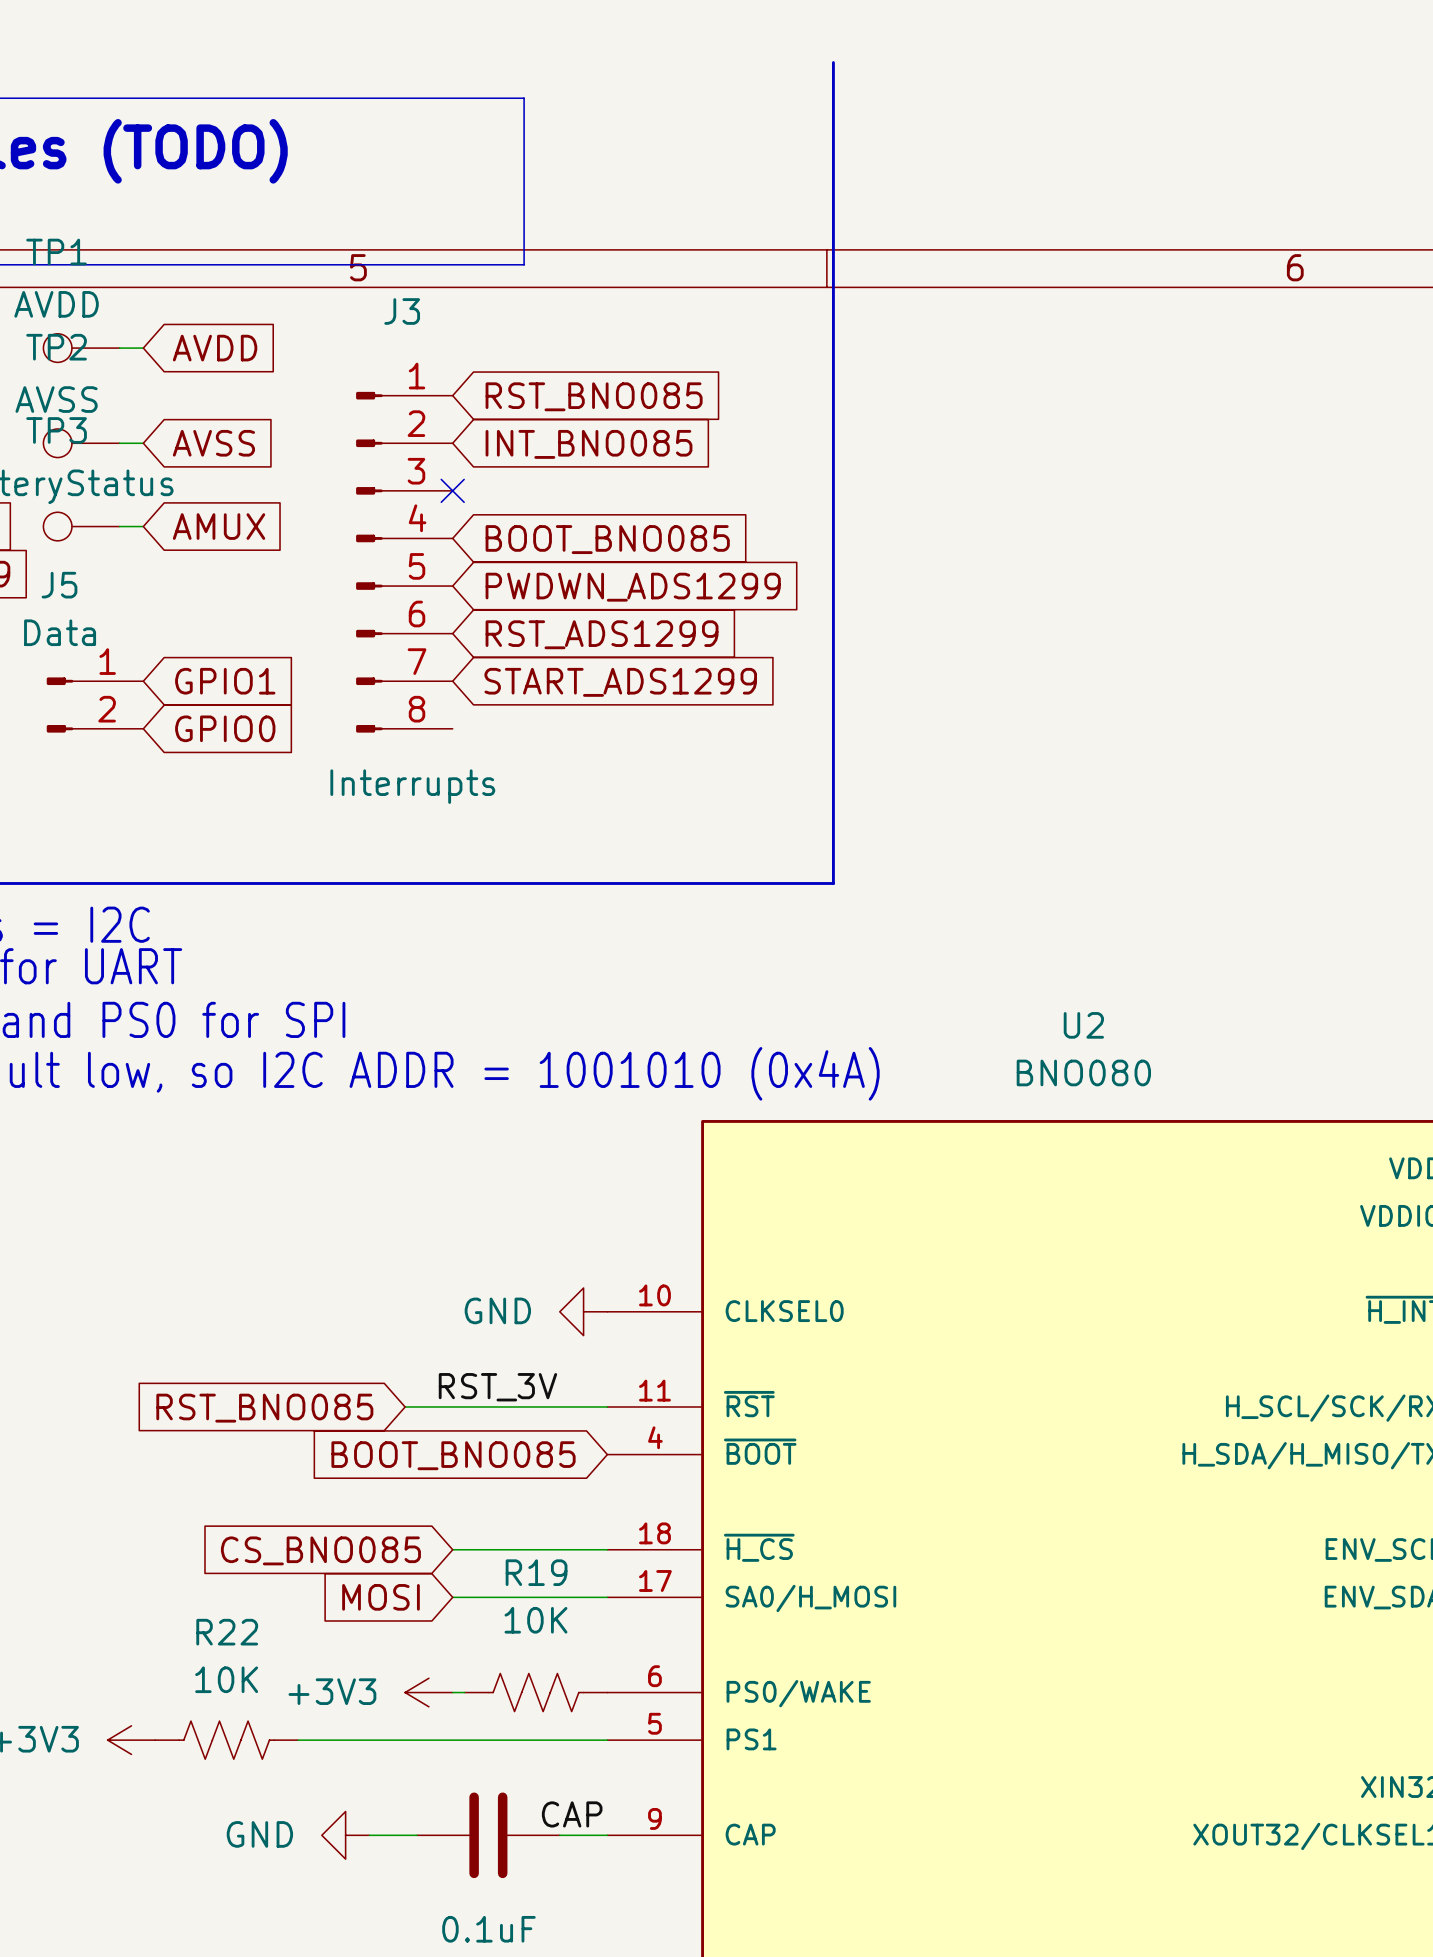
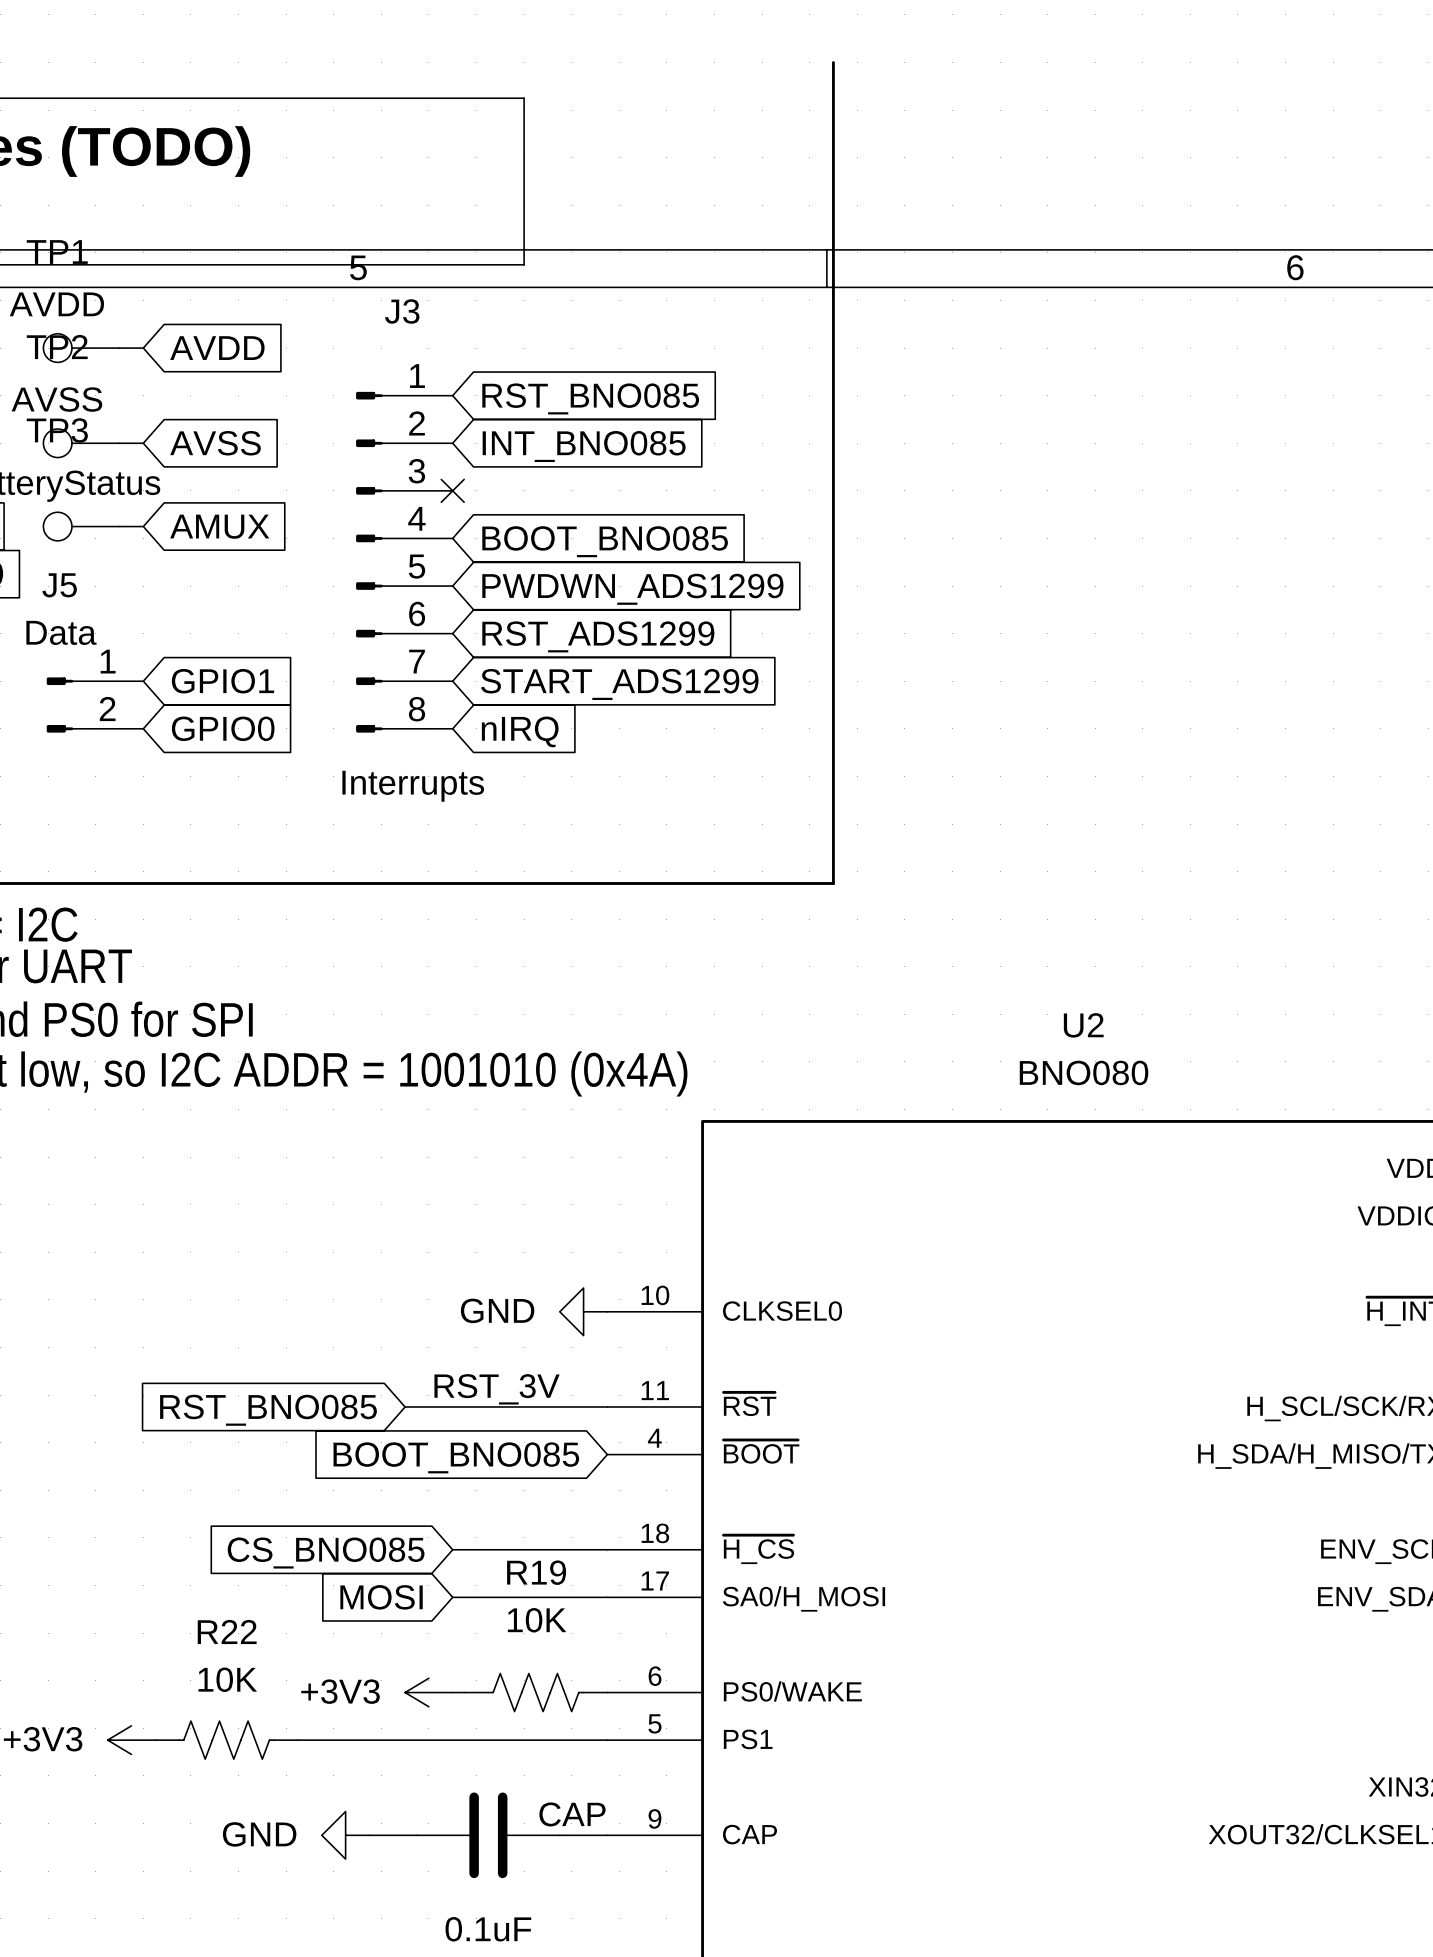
global label: none -> nIRQ (520, 731)

